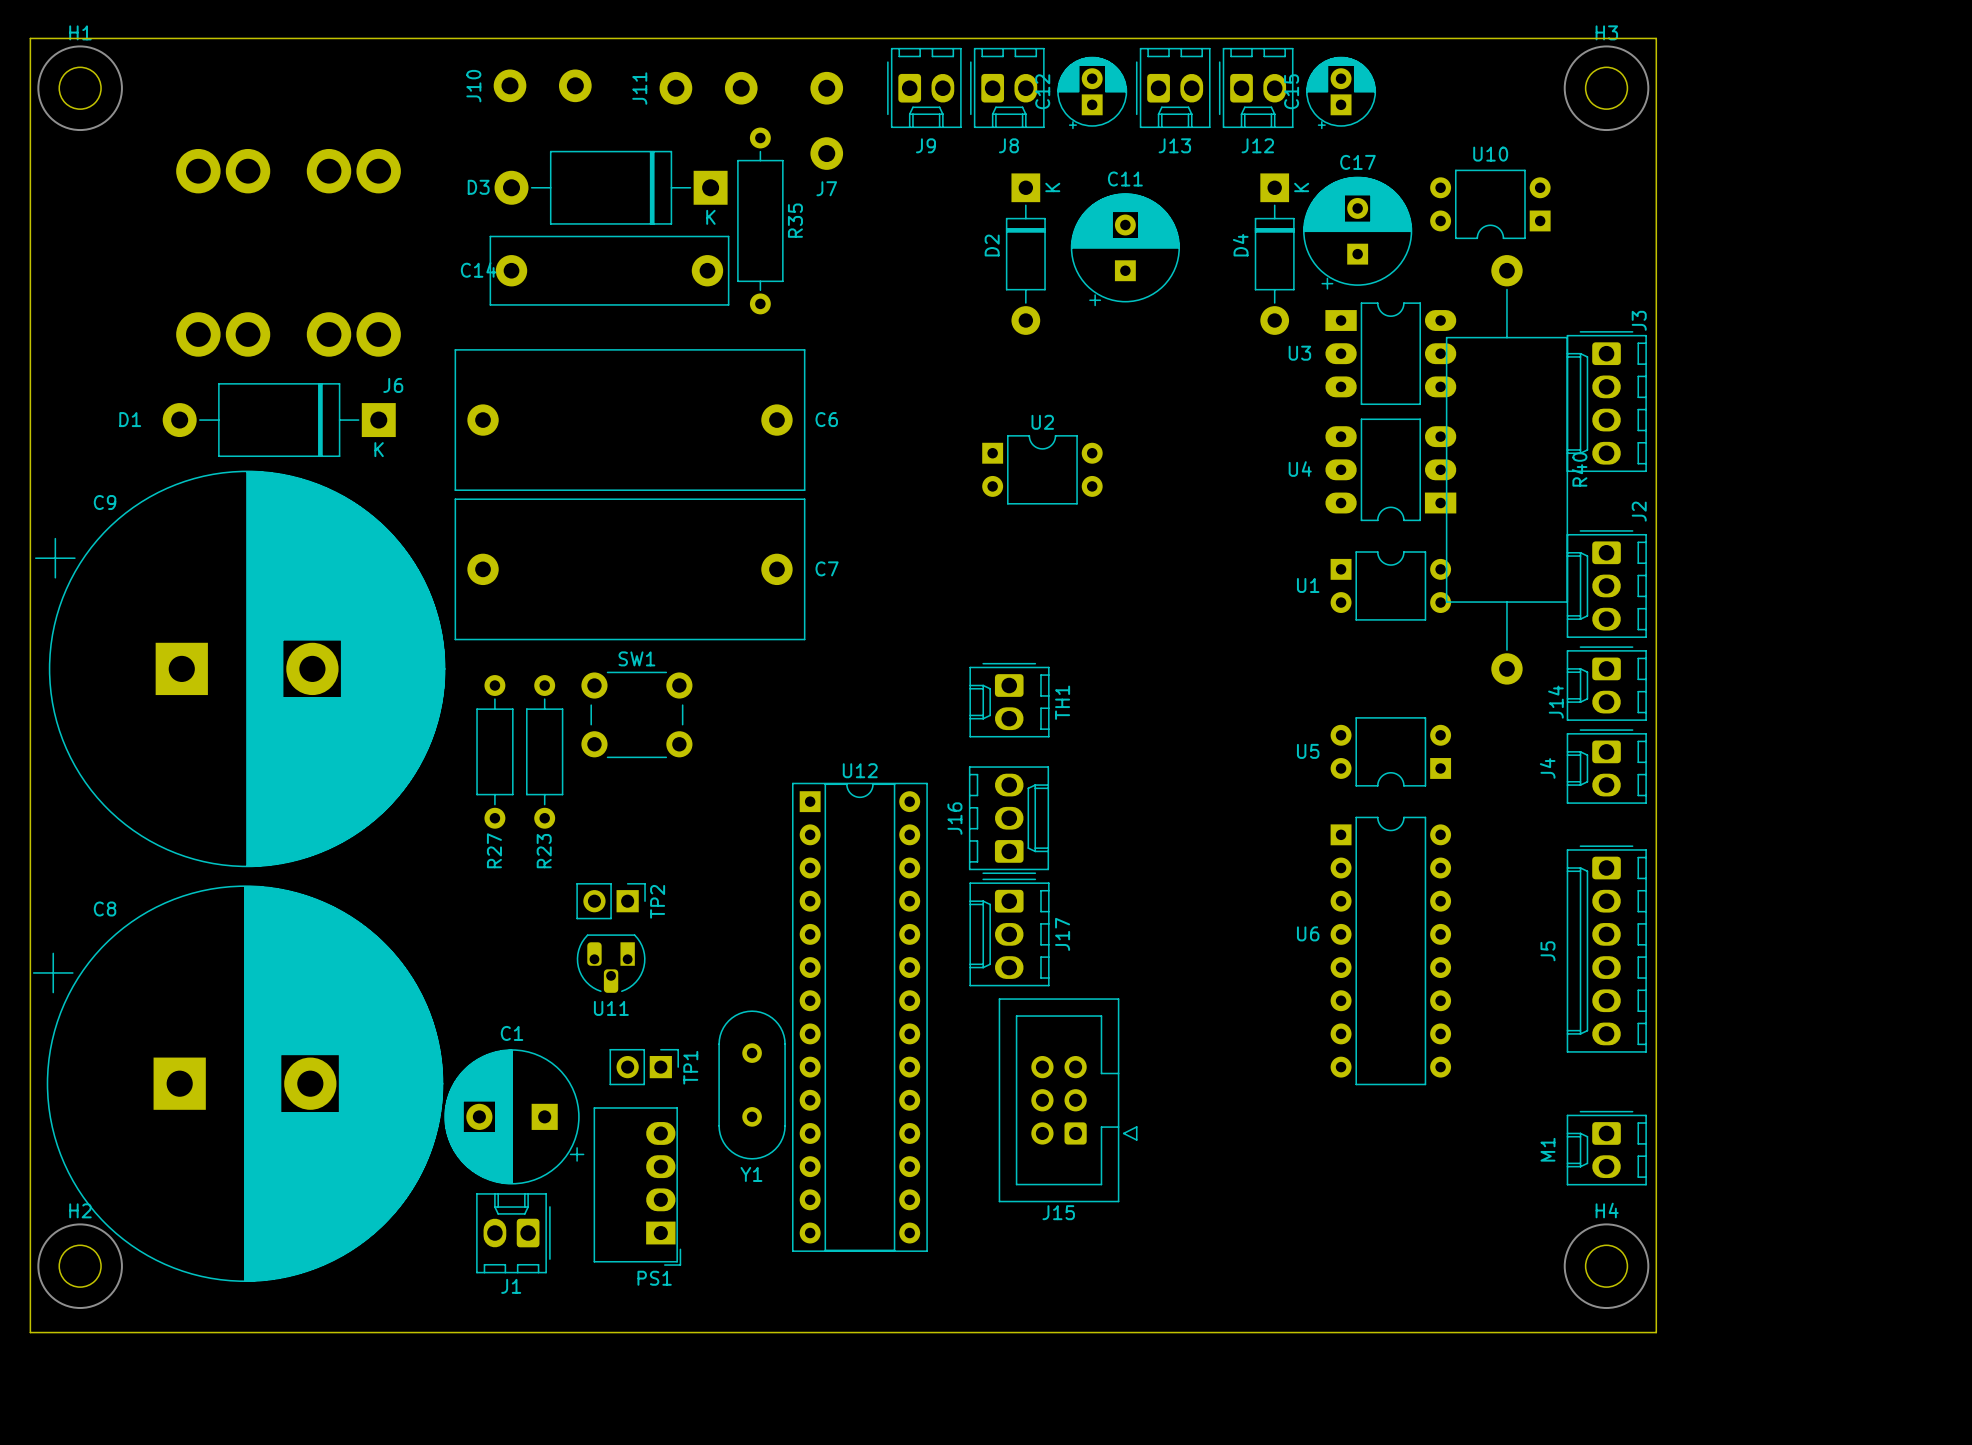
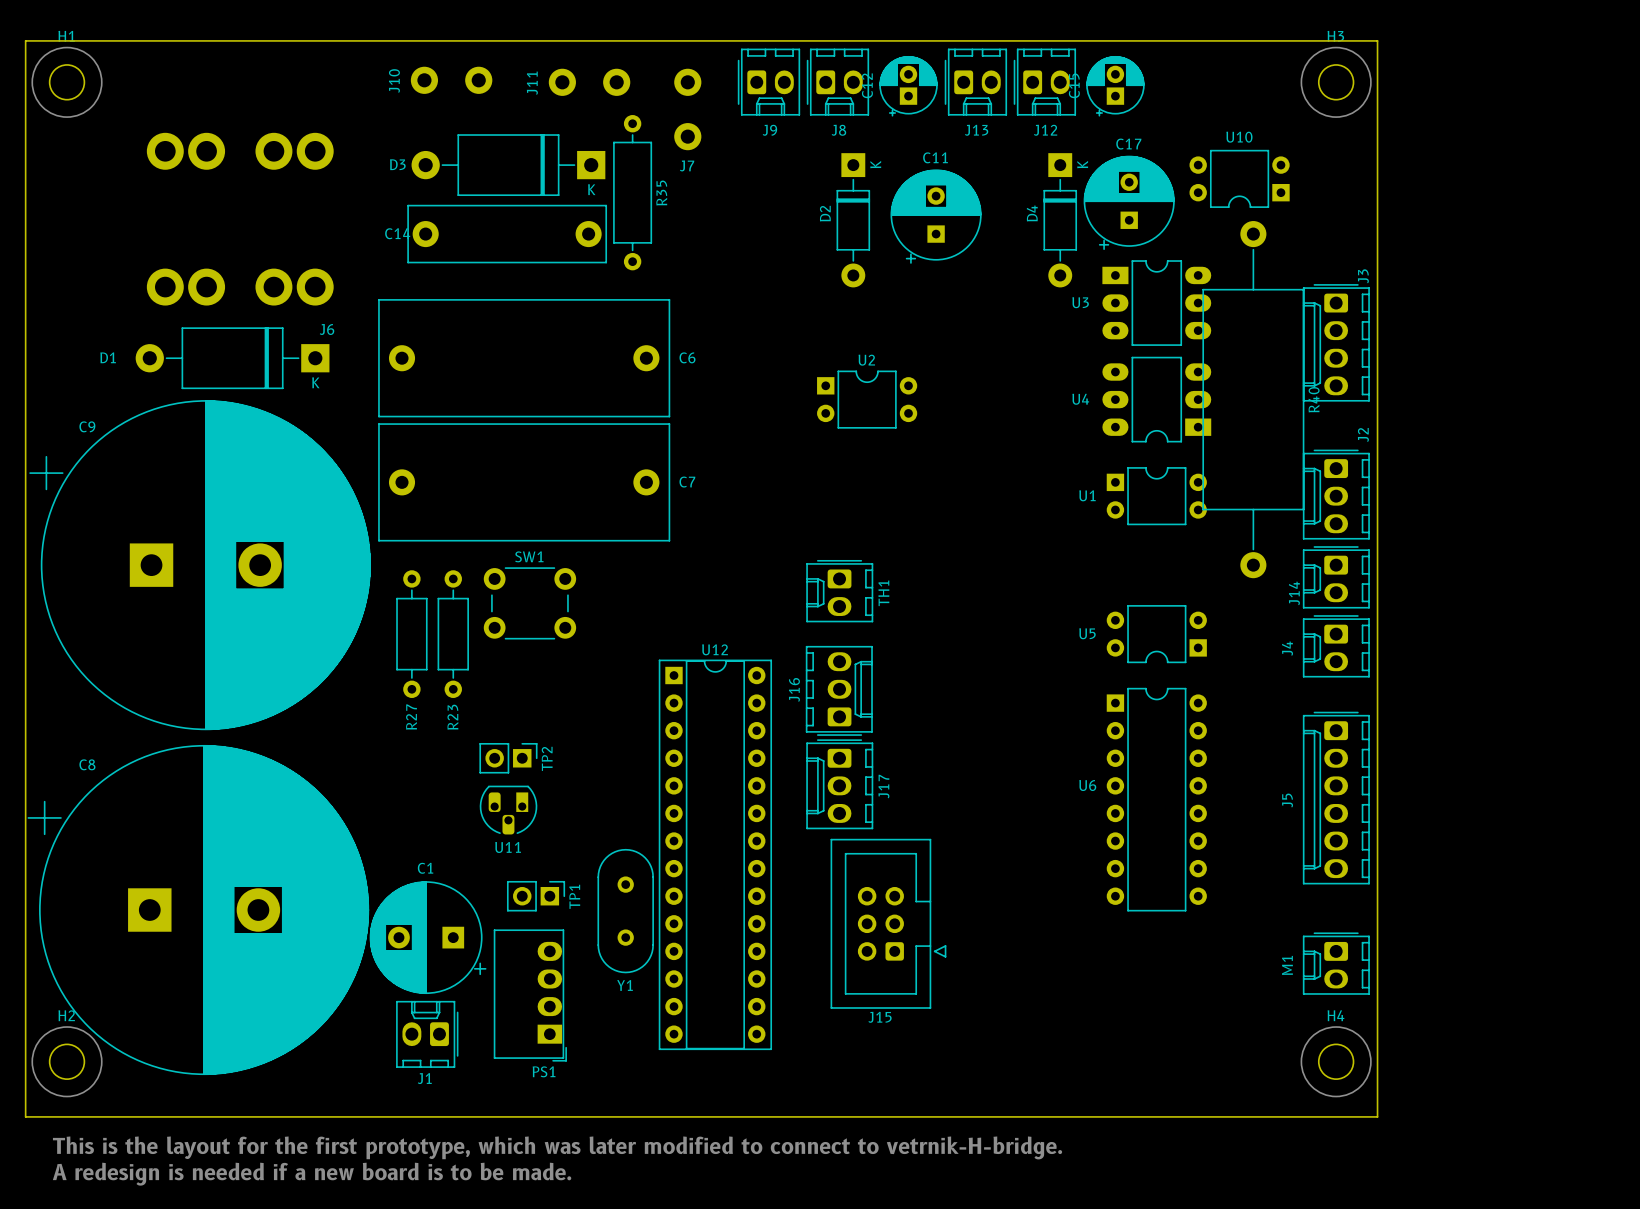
text: none -> This is the layout for the first prototype, which was later modified to connect to vetrnik-H-bridge. (557, 1147)
text: none -> A redesign is needed if a new board is to be made. (312, 1174)

